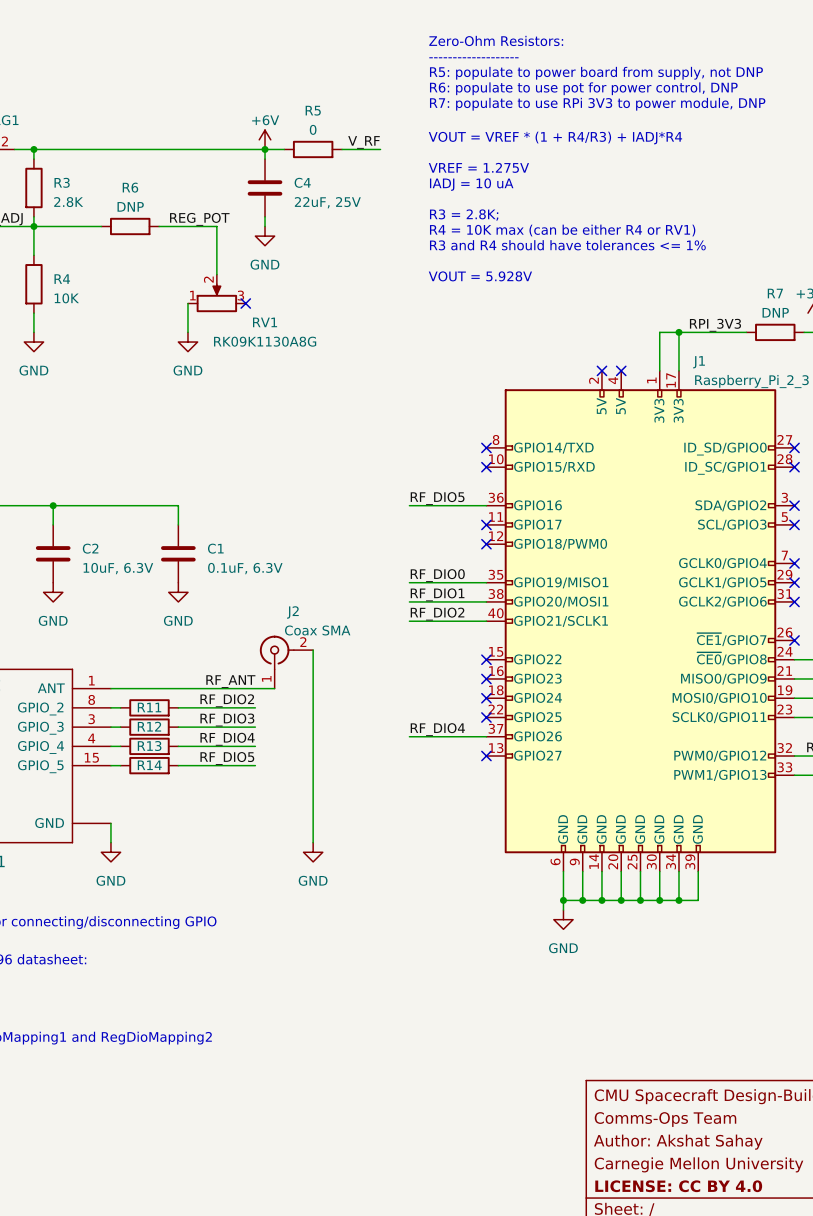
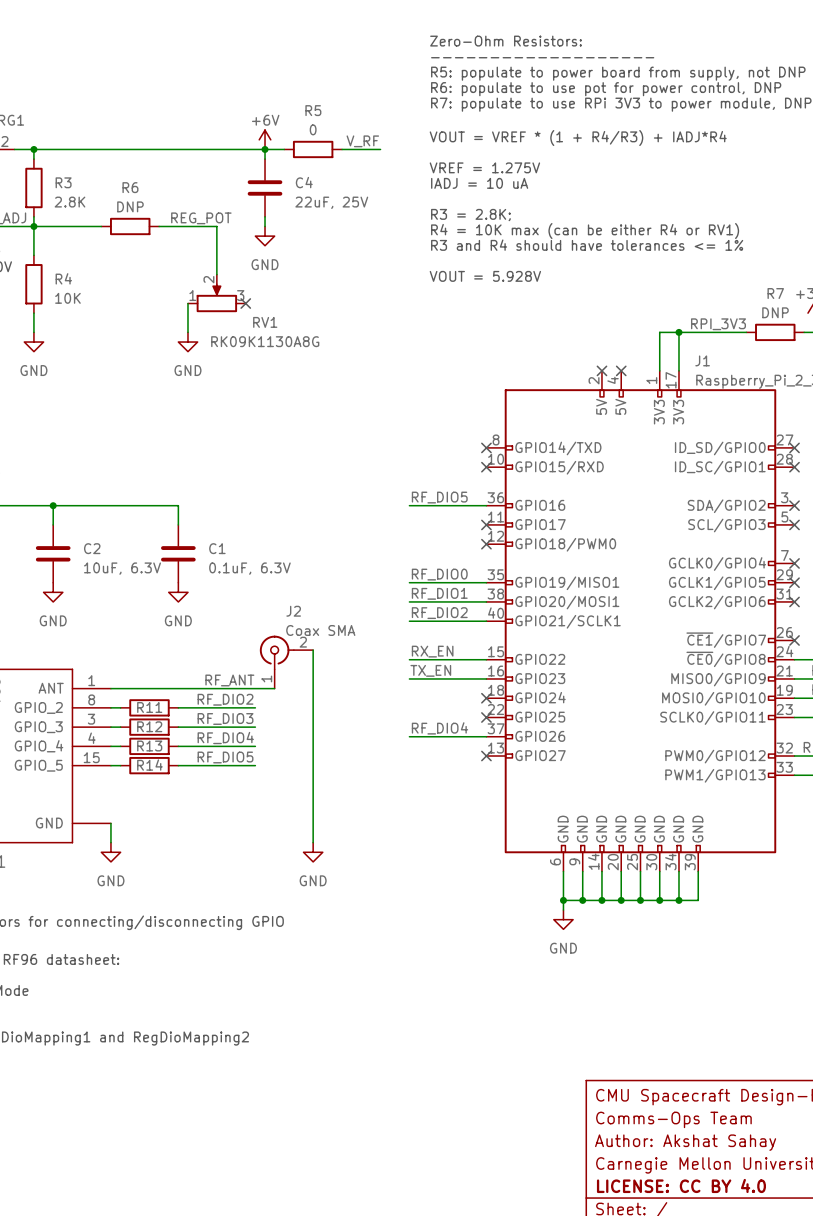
label: none -> RX_EN (432, 651)
wire: none -> (409, 659) (486, 659)
no-connect mark: (486, 659) -> none
label: none -> TX_EN (430, 670)
wire: none -> (409, 678) (486, 678)
no-connect mark: (486, 678) -> none

